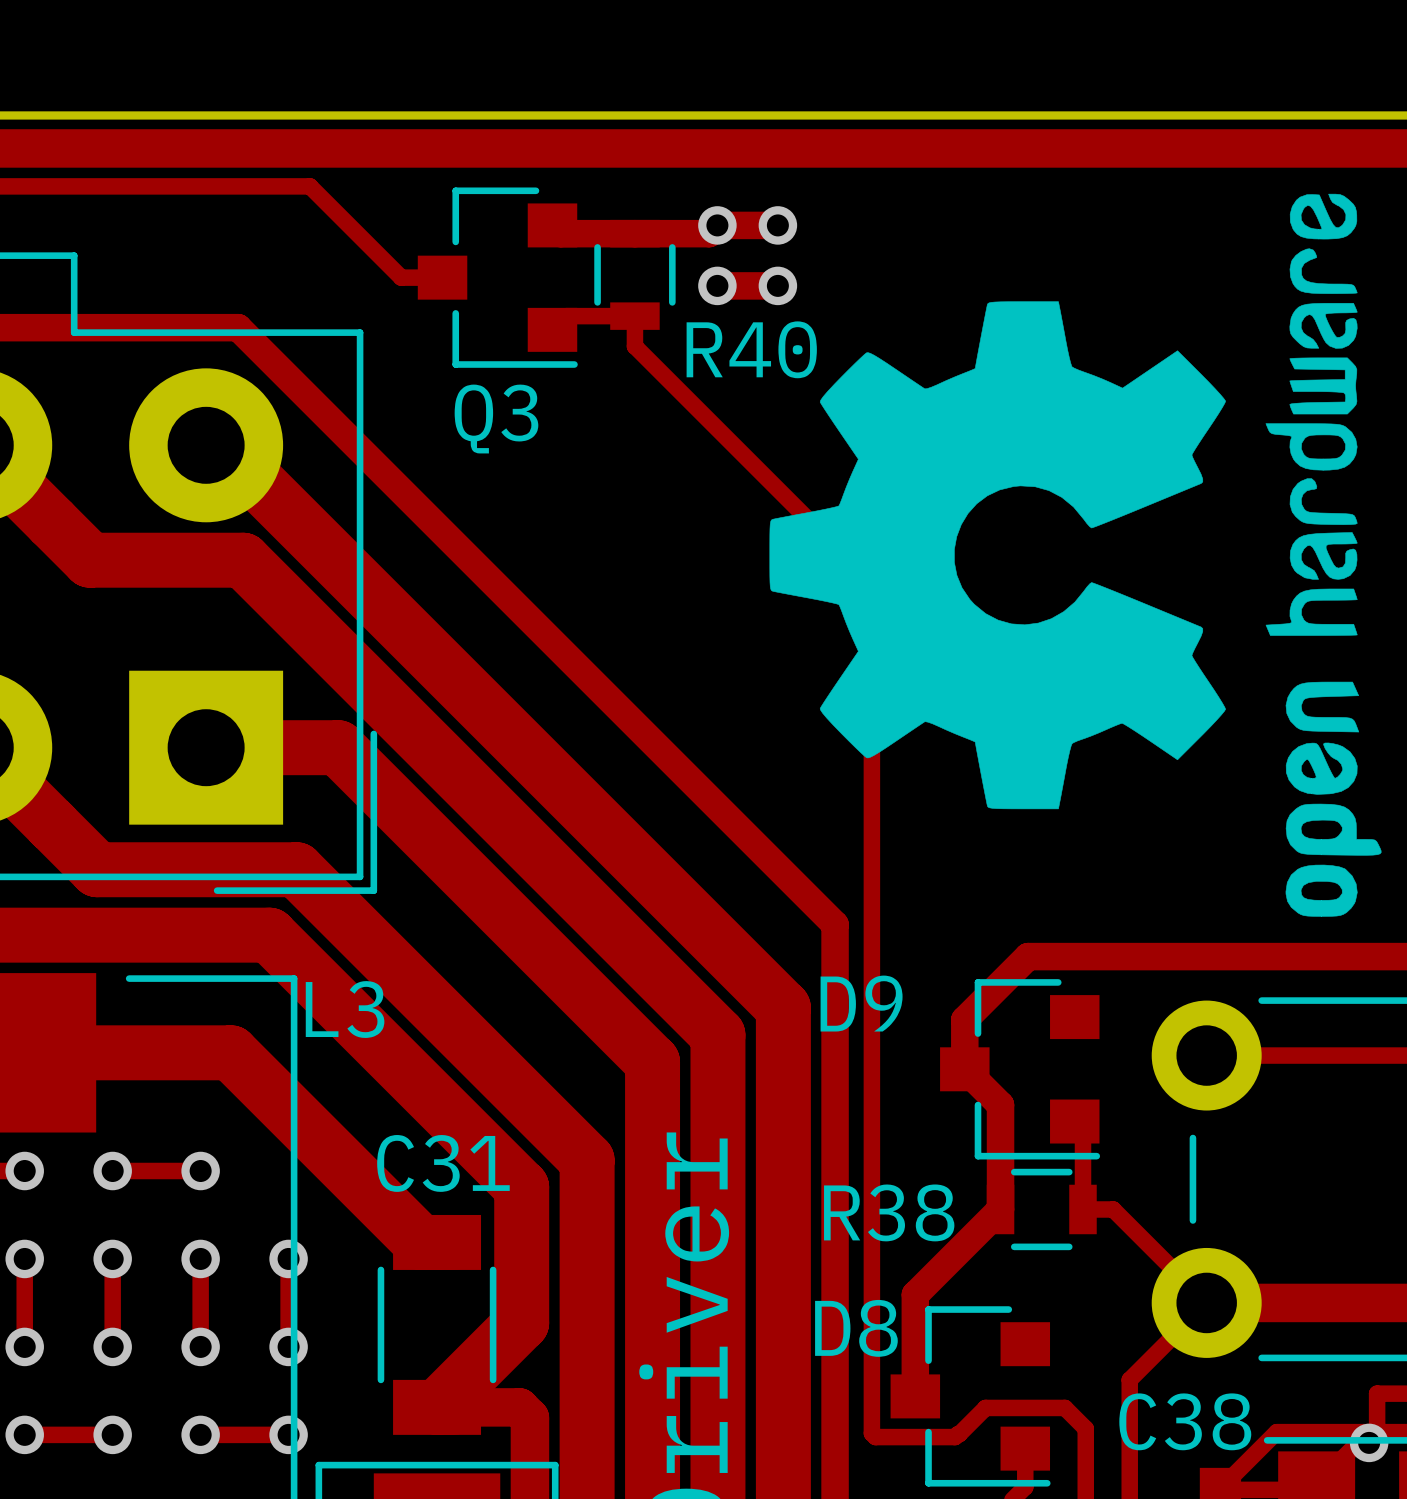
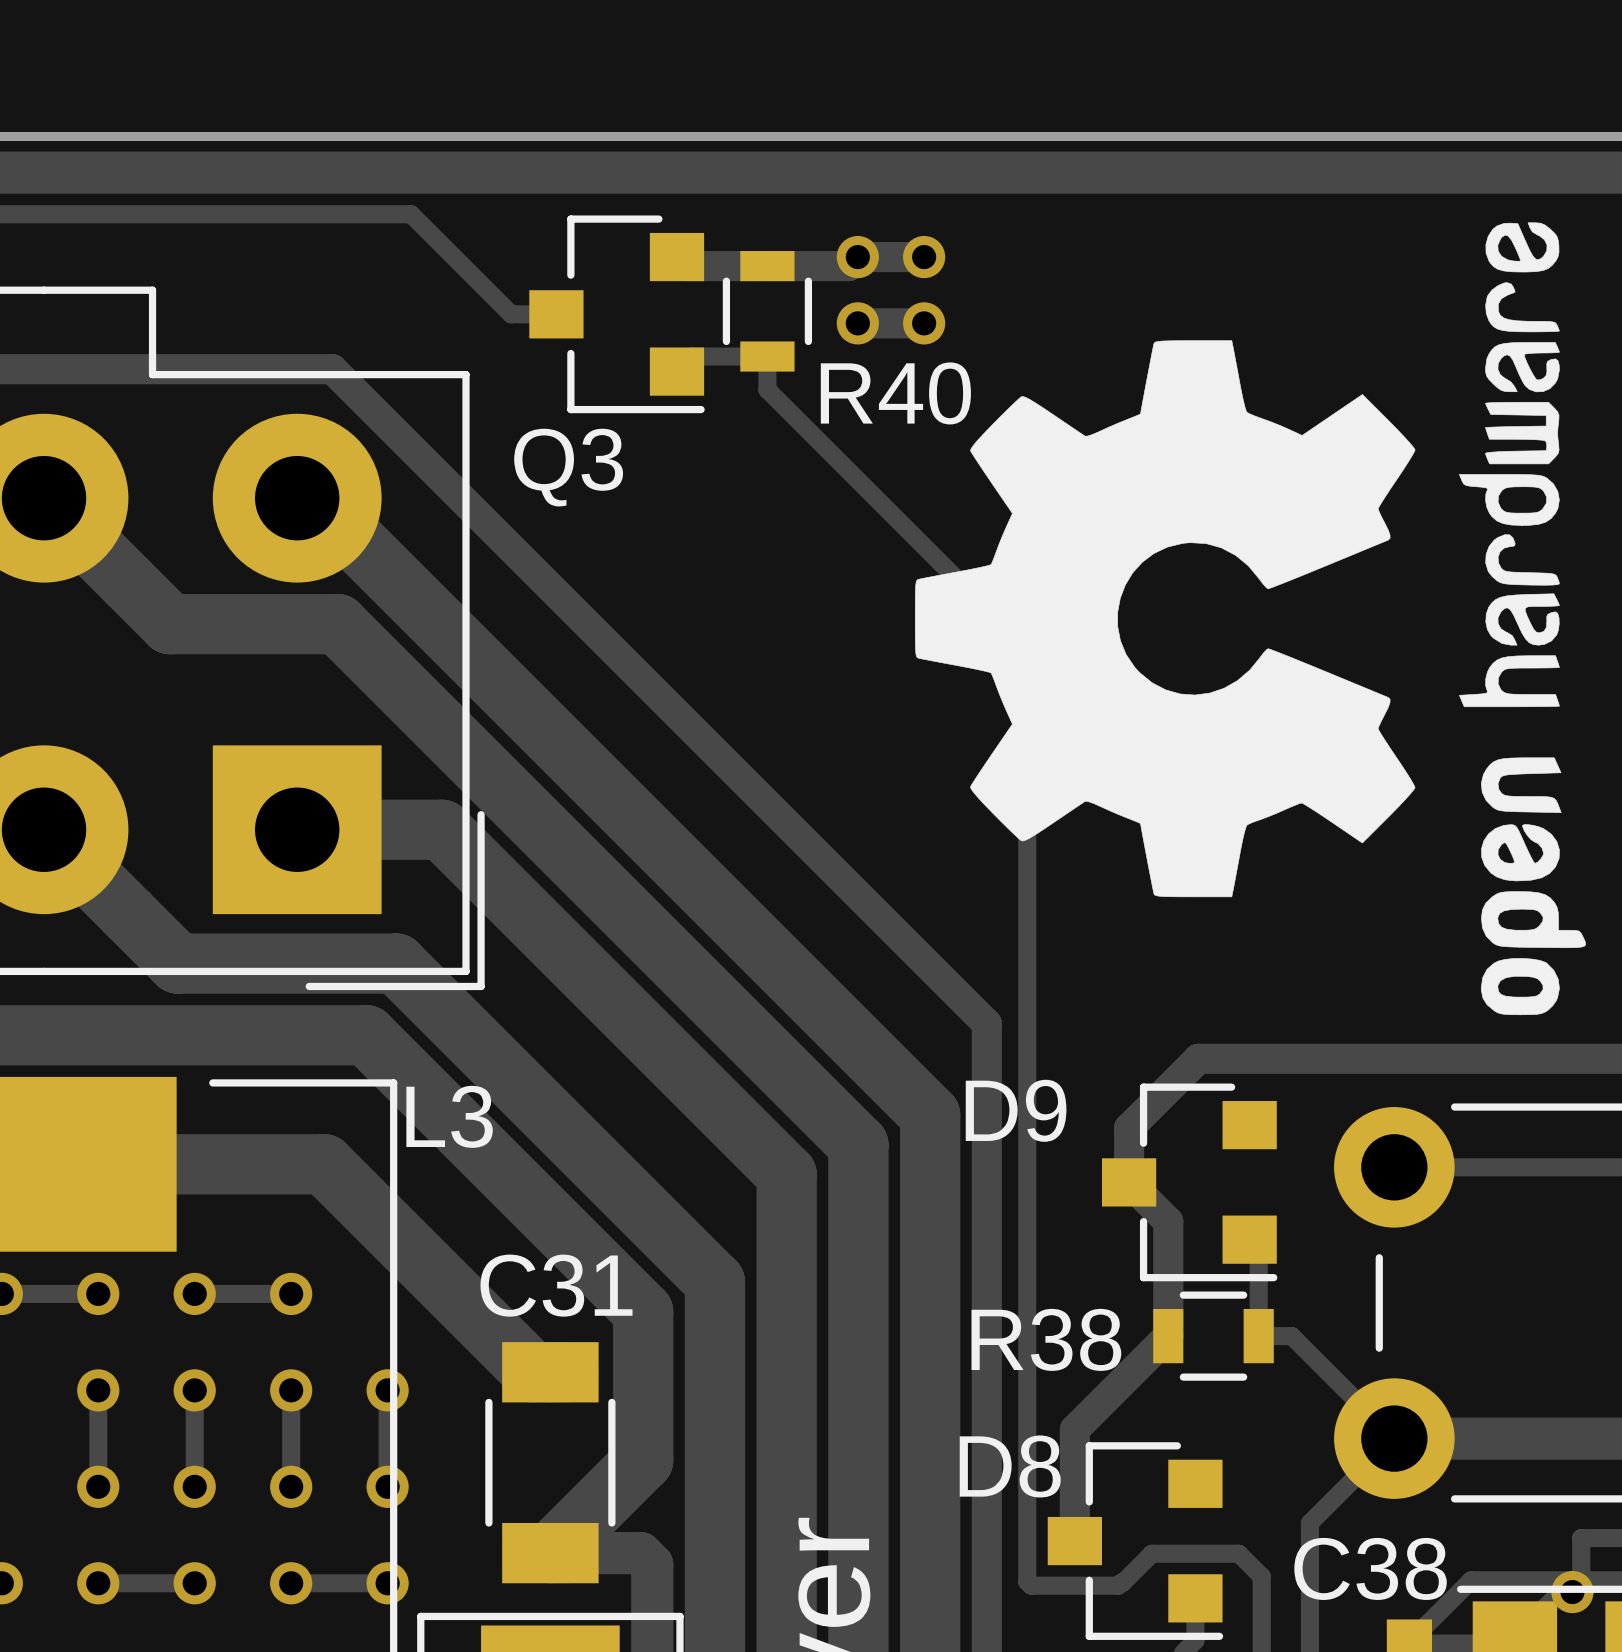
Q3 name position: Q3 (496, 419) -> Q3 (568, 467)

